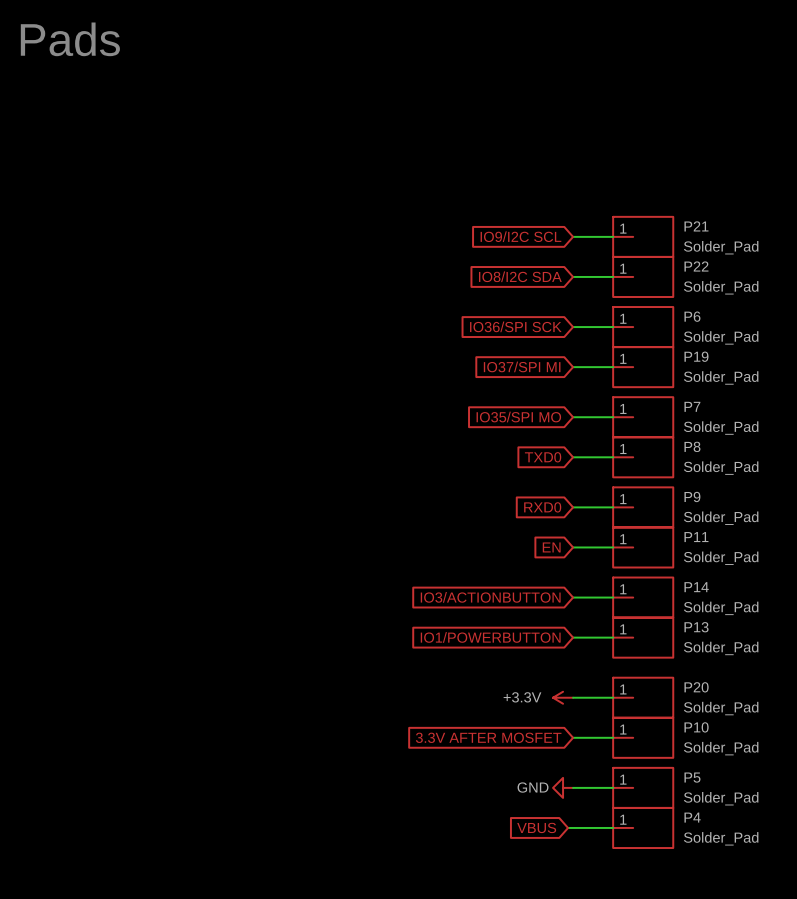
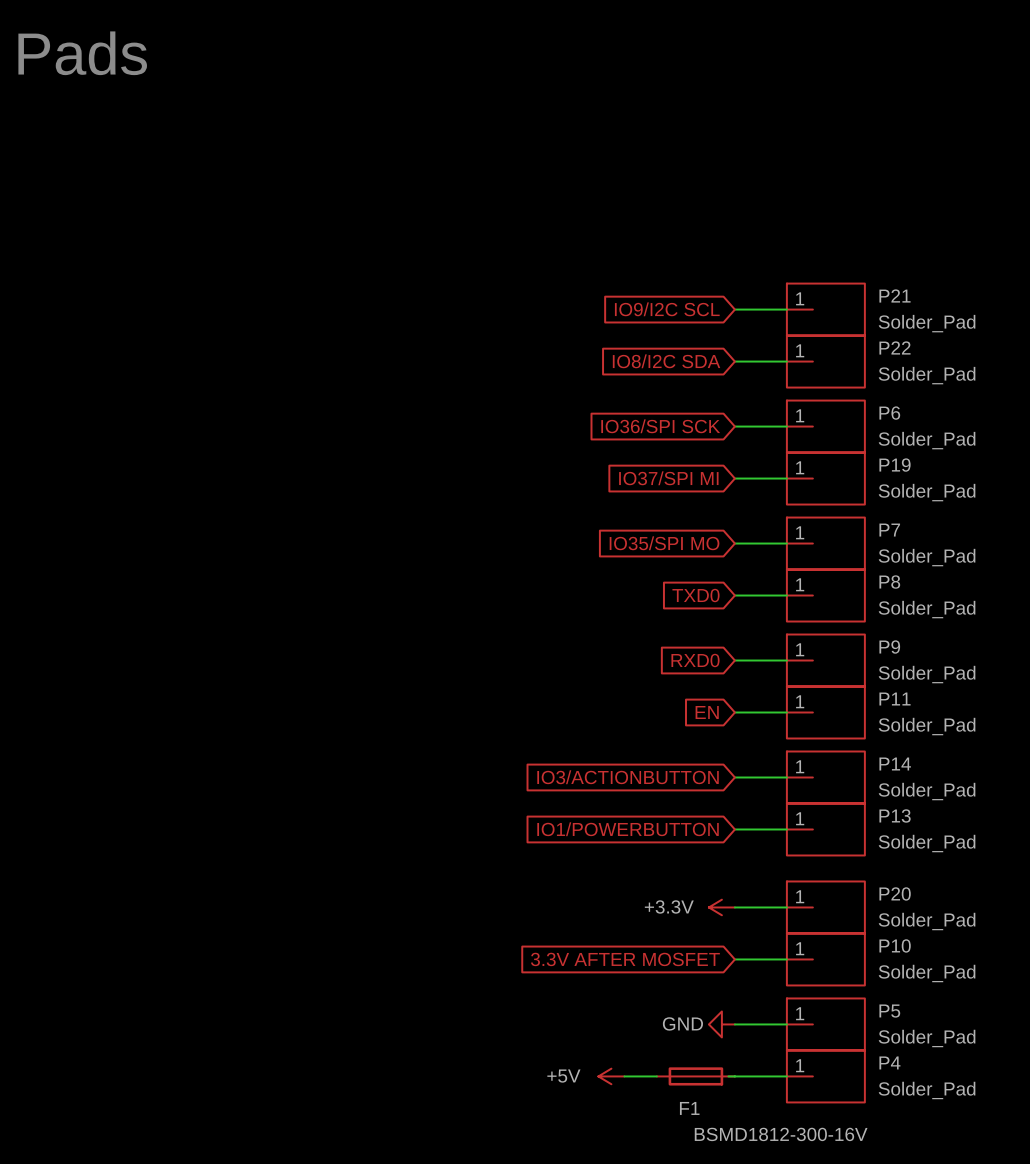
power symbol: none -> +5V (611, 1076)
wire: none -> (624, 1076) (656, 1076)
global label: VBUS (536, 827) -> none
F1: none -> BSMD1812-300-16V (695, 1076)

